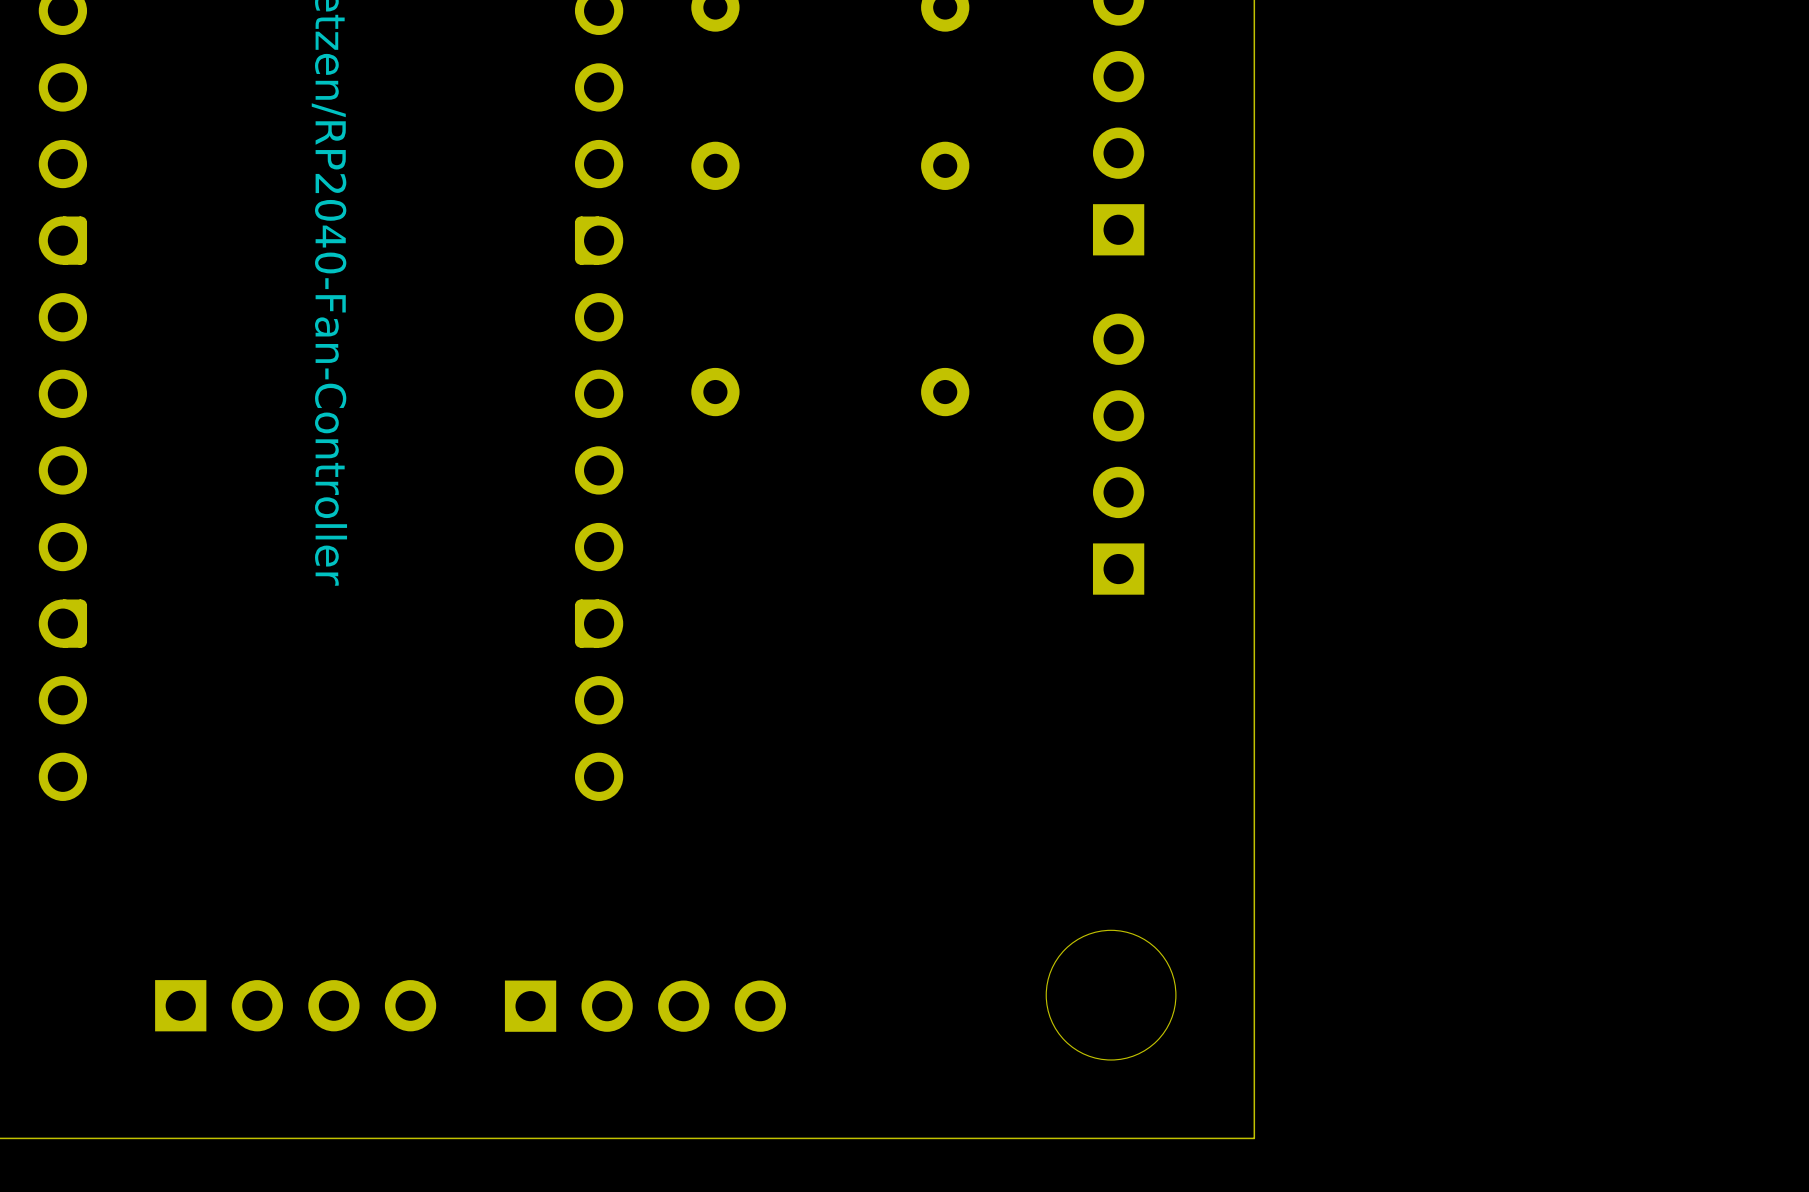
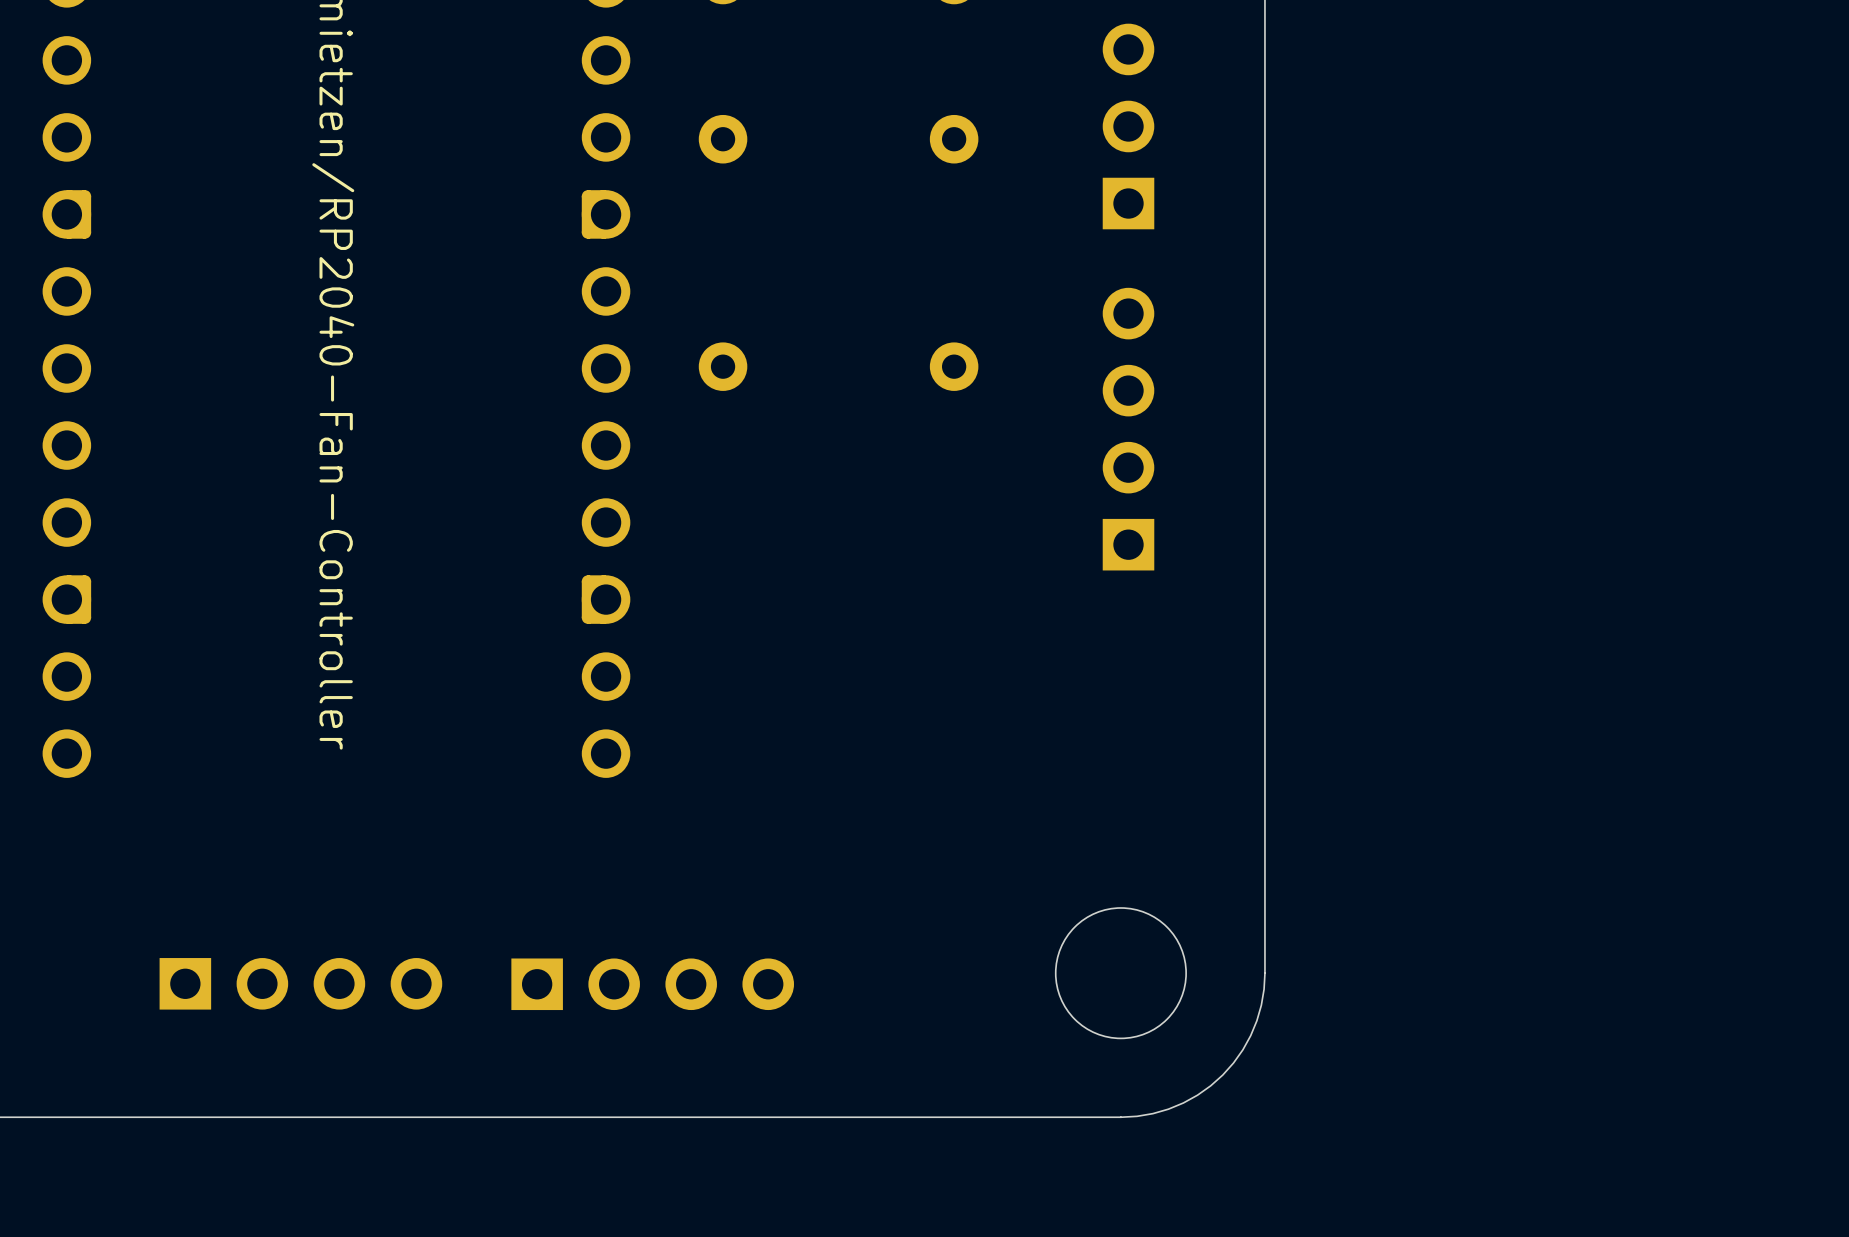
board edge: (1254, 995) (1254, 1138) (1111, 1138) -> (1264, 973) (1264, 989) (1256, 1020) (1242, 1049) (1222, 1075) (1197, 1095) (1168, 1109) (1152, 1113) (1120, 1117)

